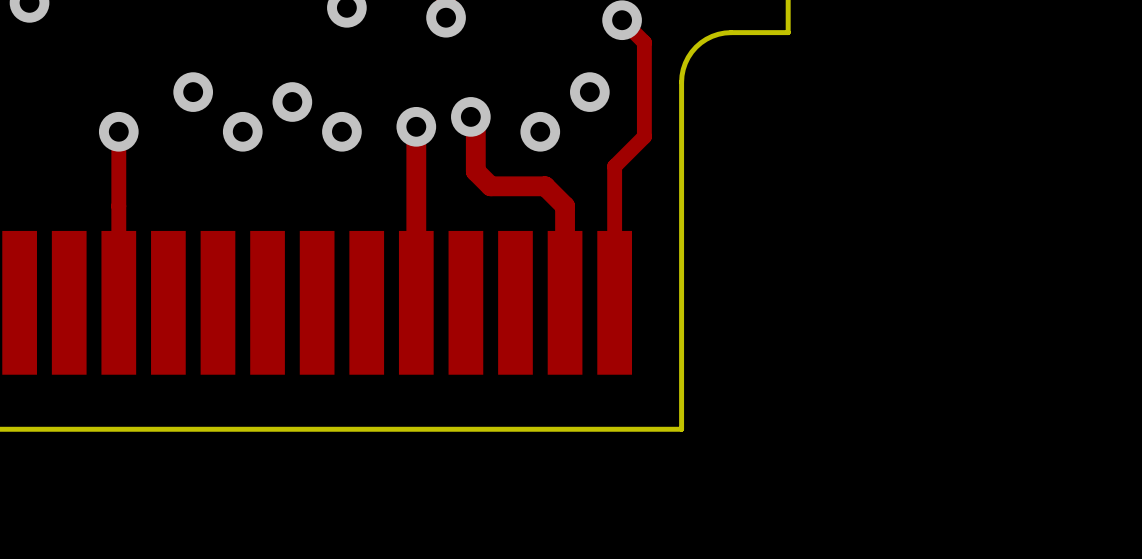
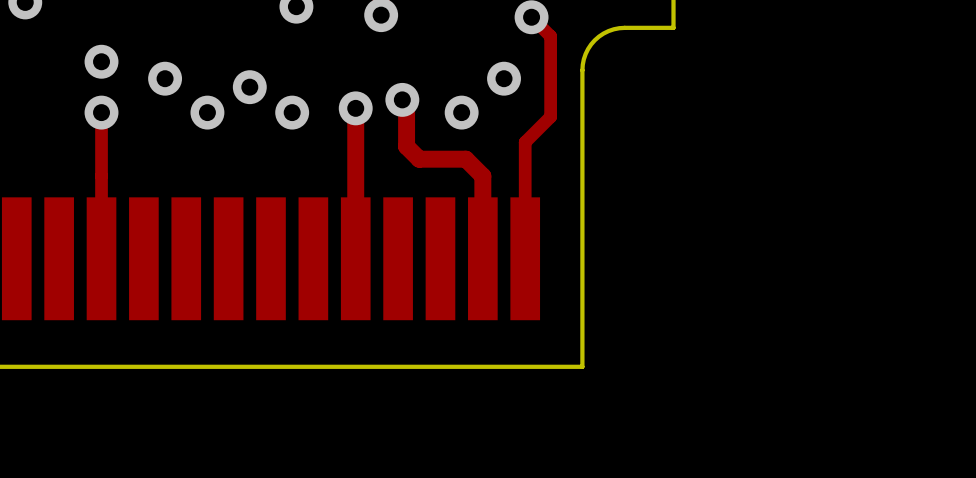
via: none -> (101, 61)

